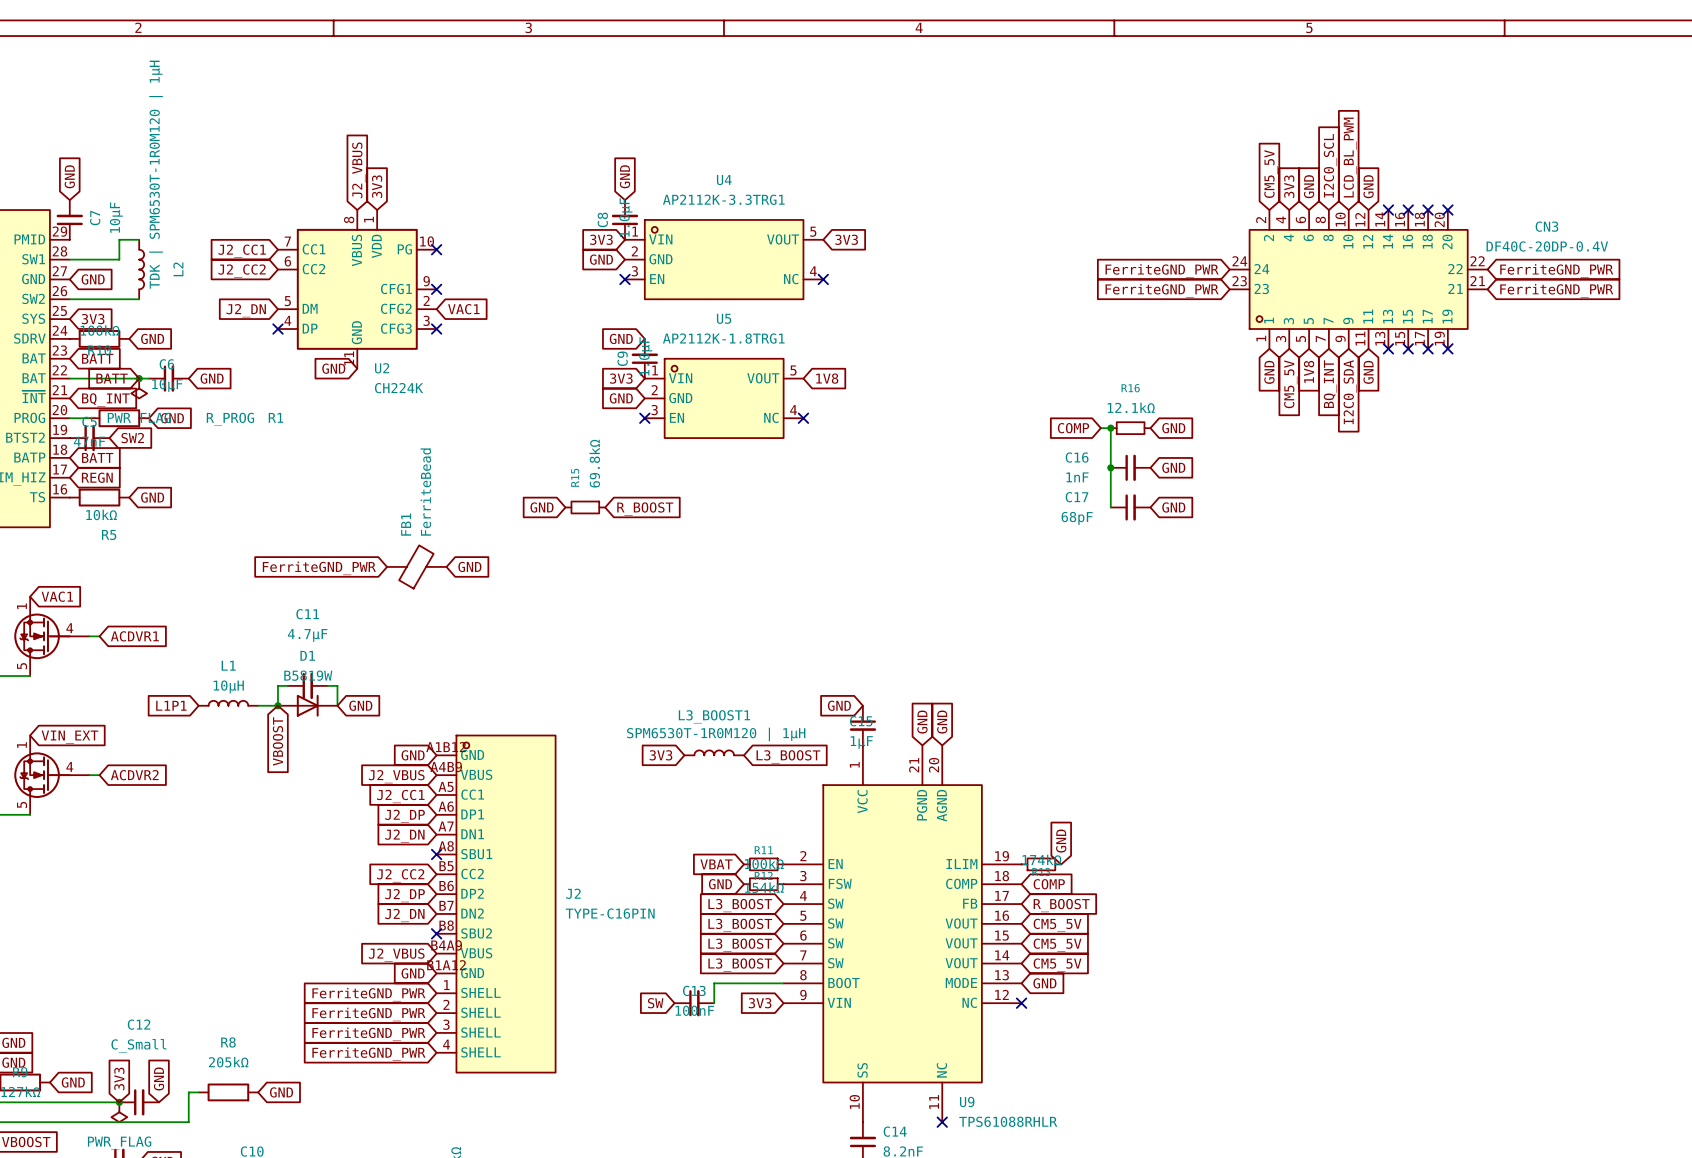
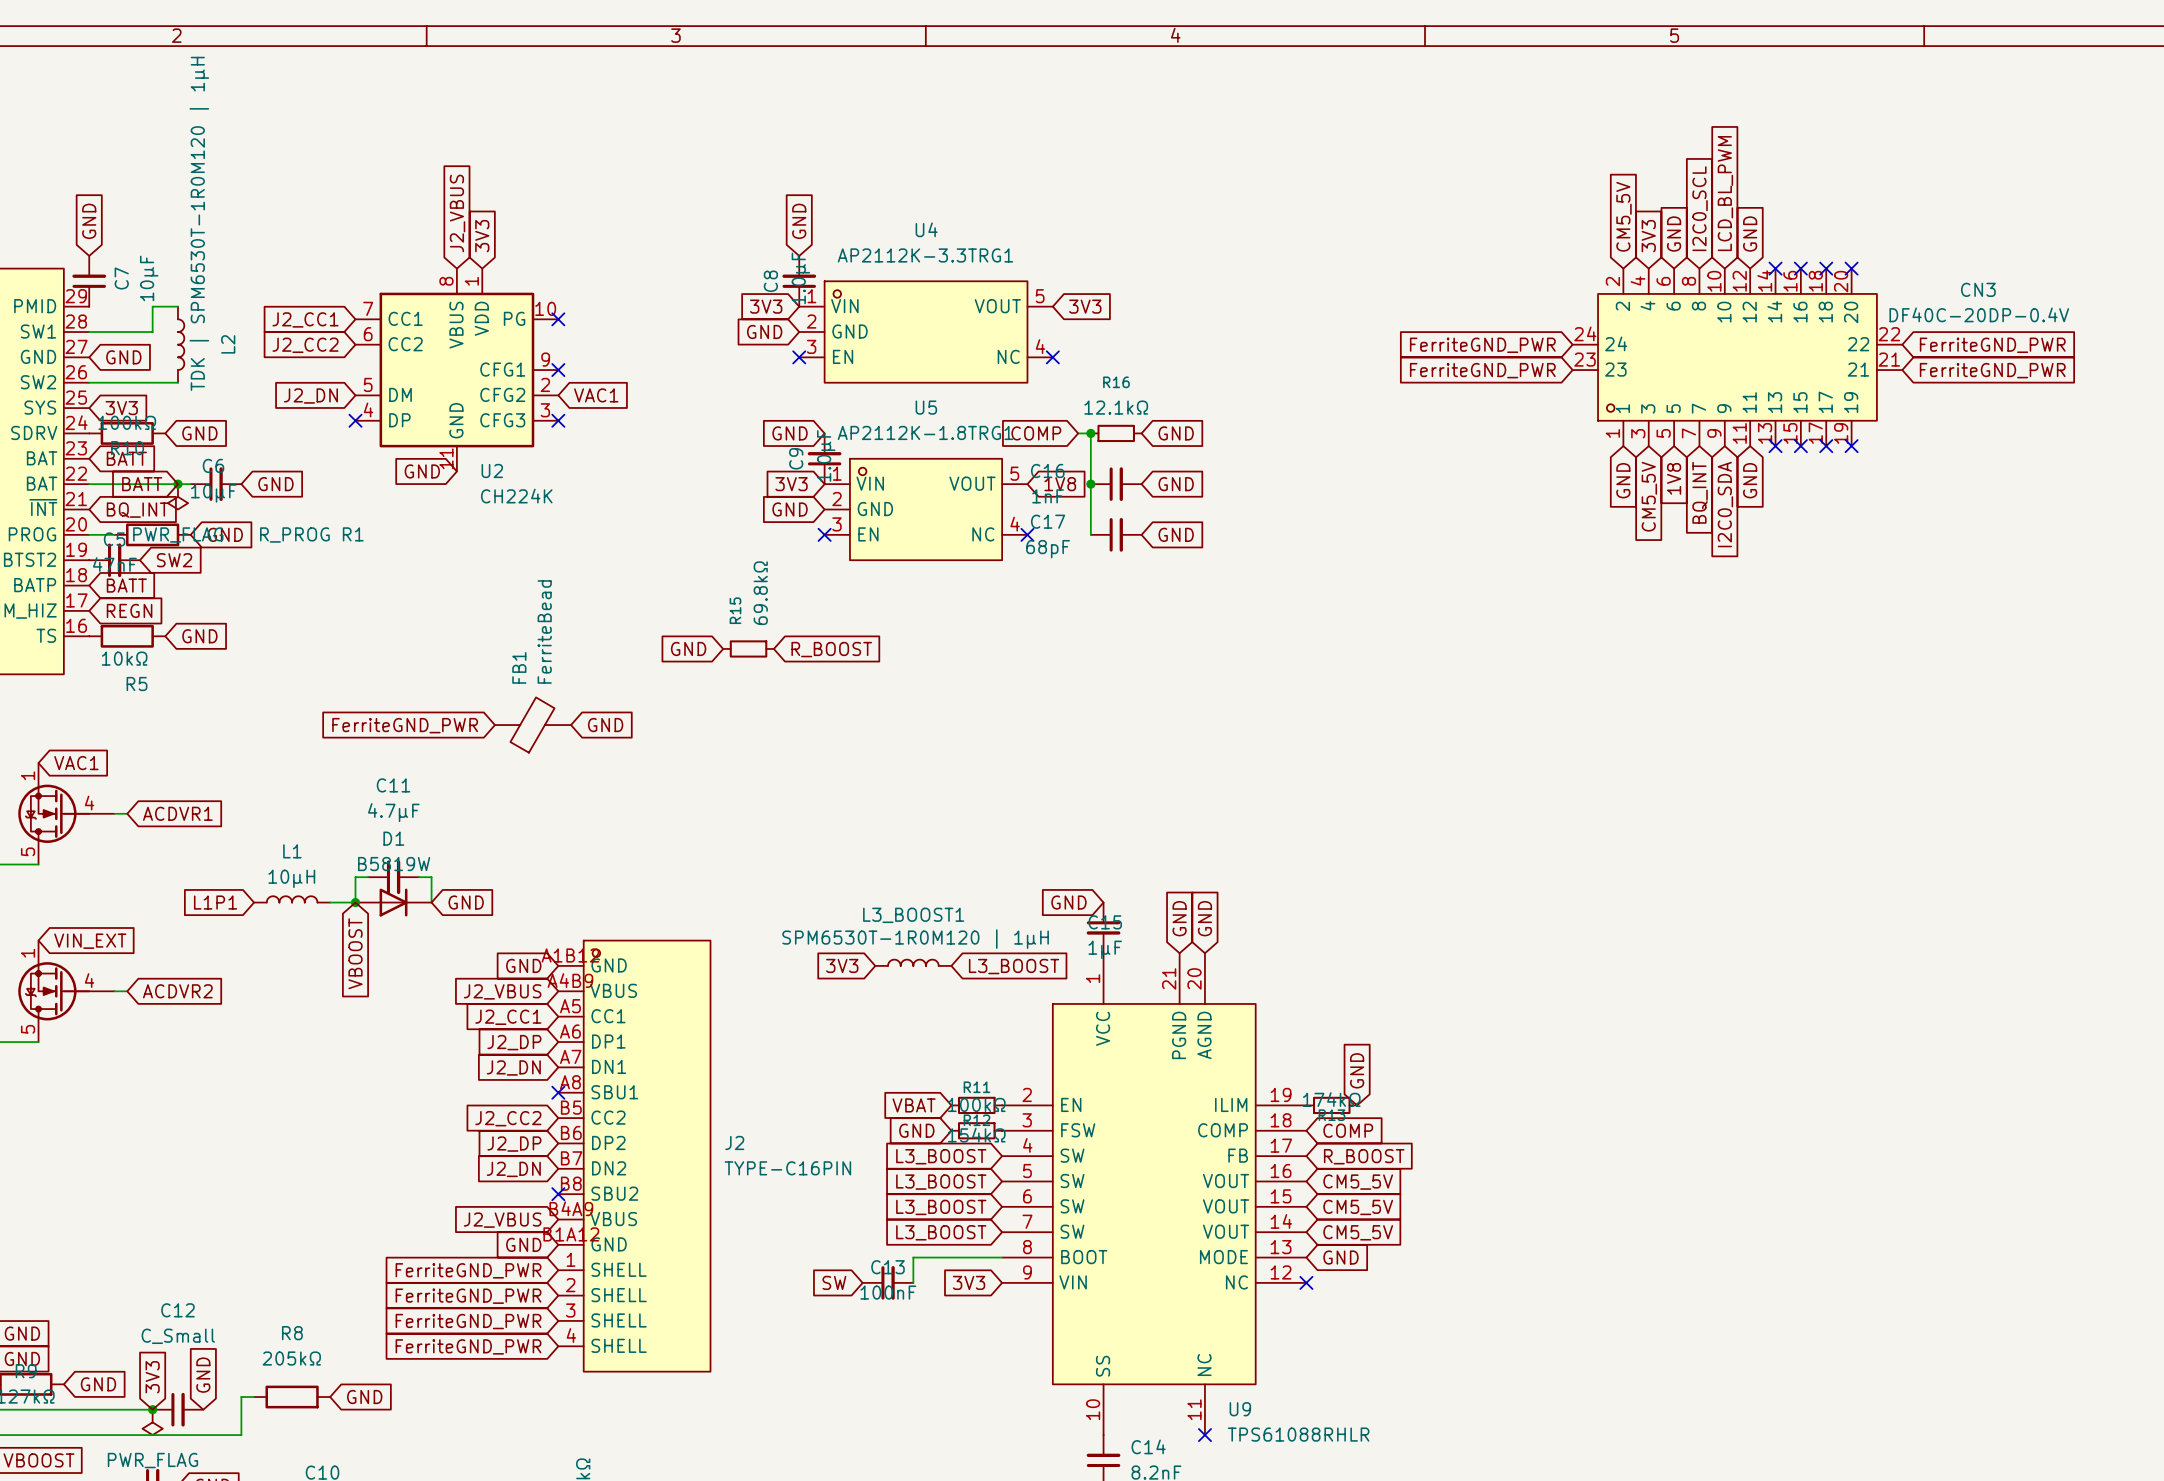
global label: none -> COMP (1036, 433)
wire: none -> (1078, 433) (1090, 433) (1090, 534)
junction: none -> (1090, 433)
global label: none -> GND (1176, 433)
junction: none -> (1090, 484)
global label: none -> GND (1176, 484)
global label: none -> GND (1176, 534)
global label: COMP (1073, 428) -> none
wire: (1100, 428) (1110, 428) (1110, 507) -> none
junction: (1110, 428) -> none
R16 position: (1130, 428) -> (1116, 433)
global label: GND (1173, 428) -> none
junction: (1110, 467) -> none
C16 position: (1130, 467) -> (1116, 484)
global label: GND (1173, 467) -> none
C17 position: (1130, 507) -> (1116, 534)
global label: GND (1173, 507) -> none

